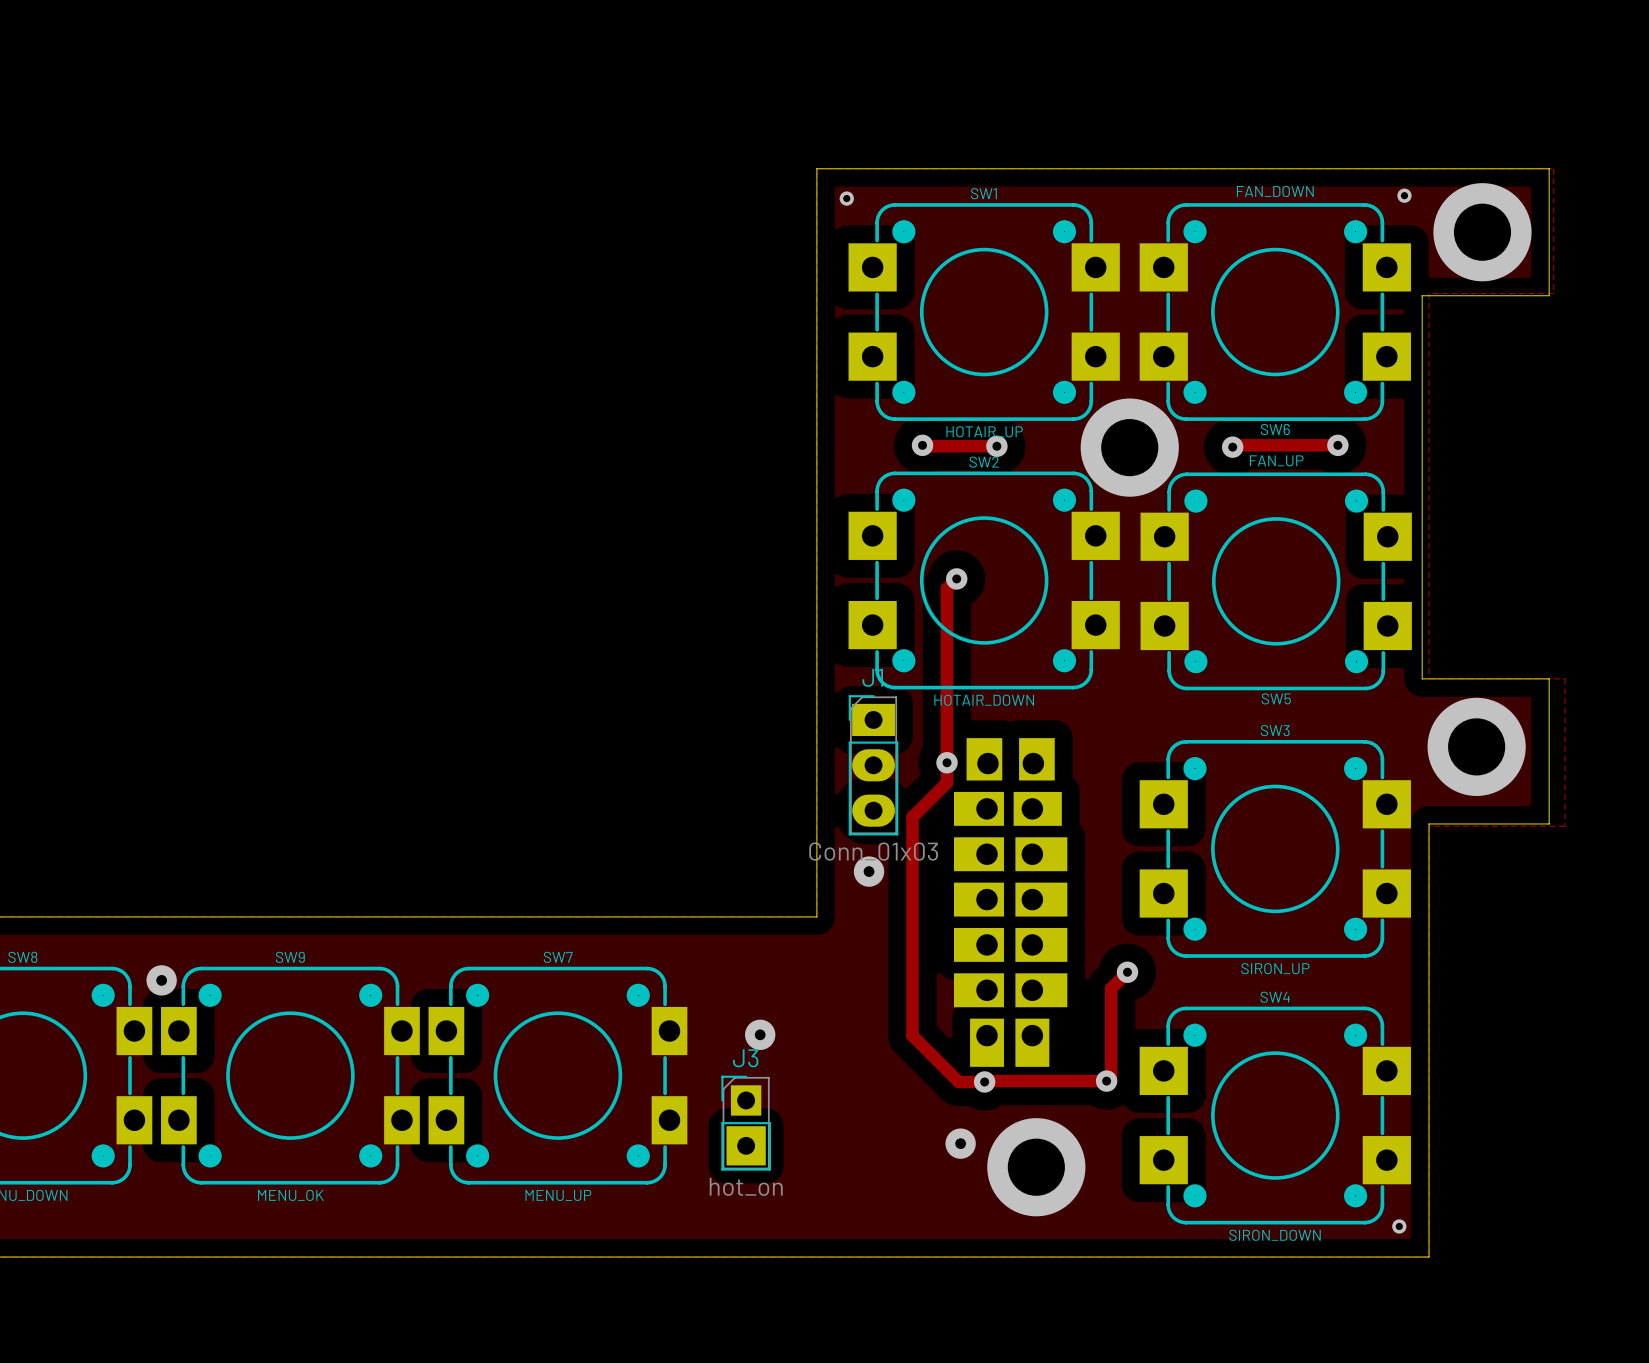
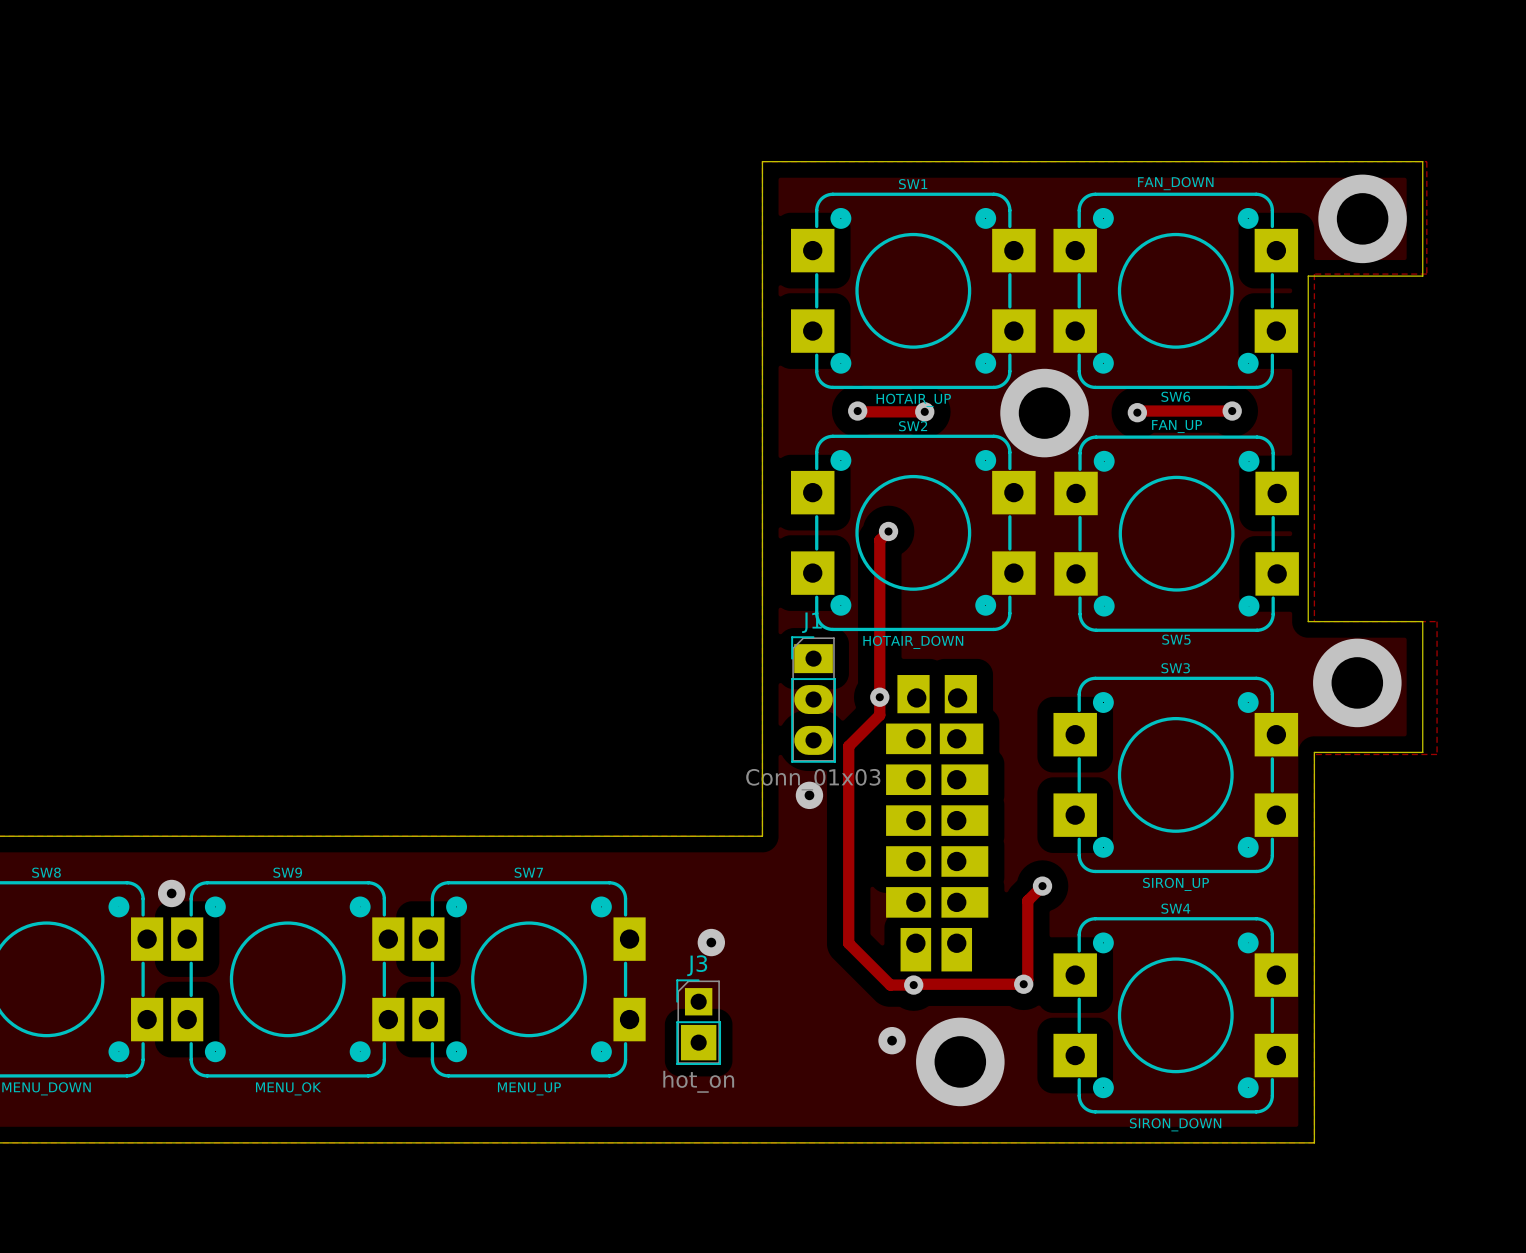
via: (1404, 195) -> none
via: (846, 198) -> none
via: (1399, 1226) -> none

